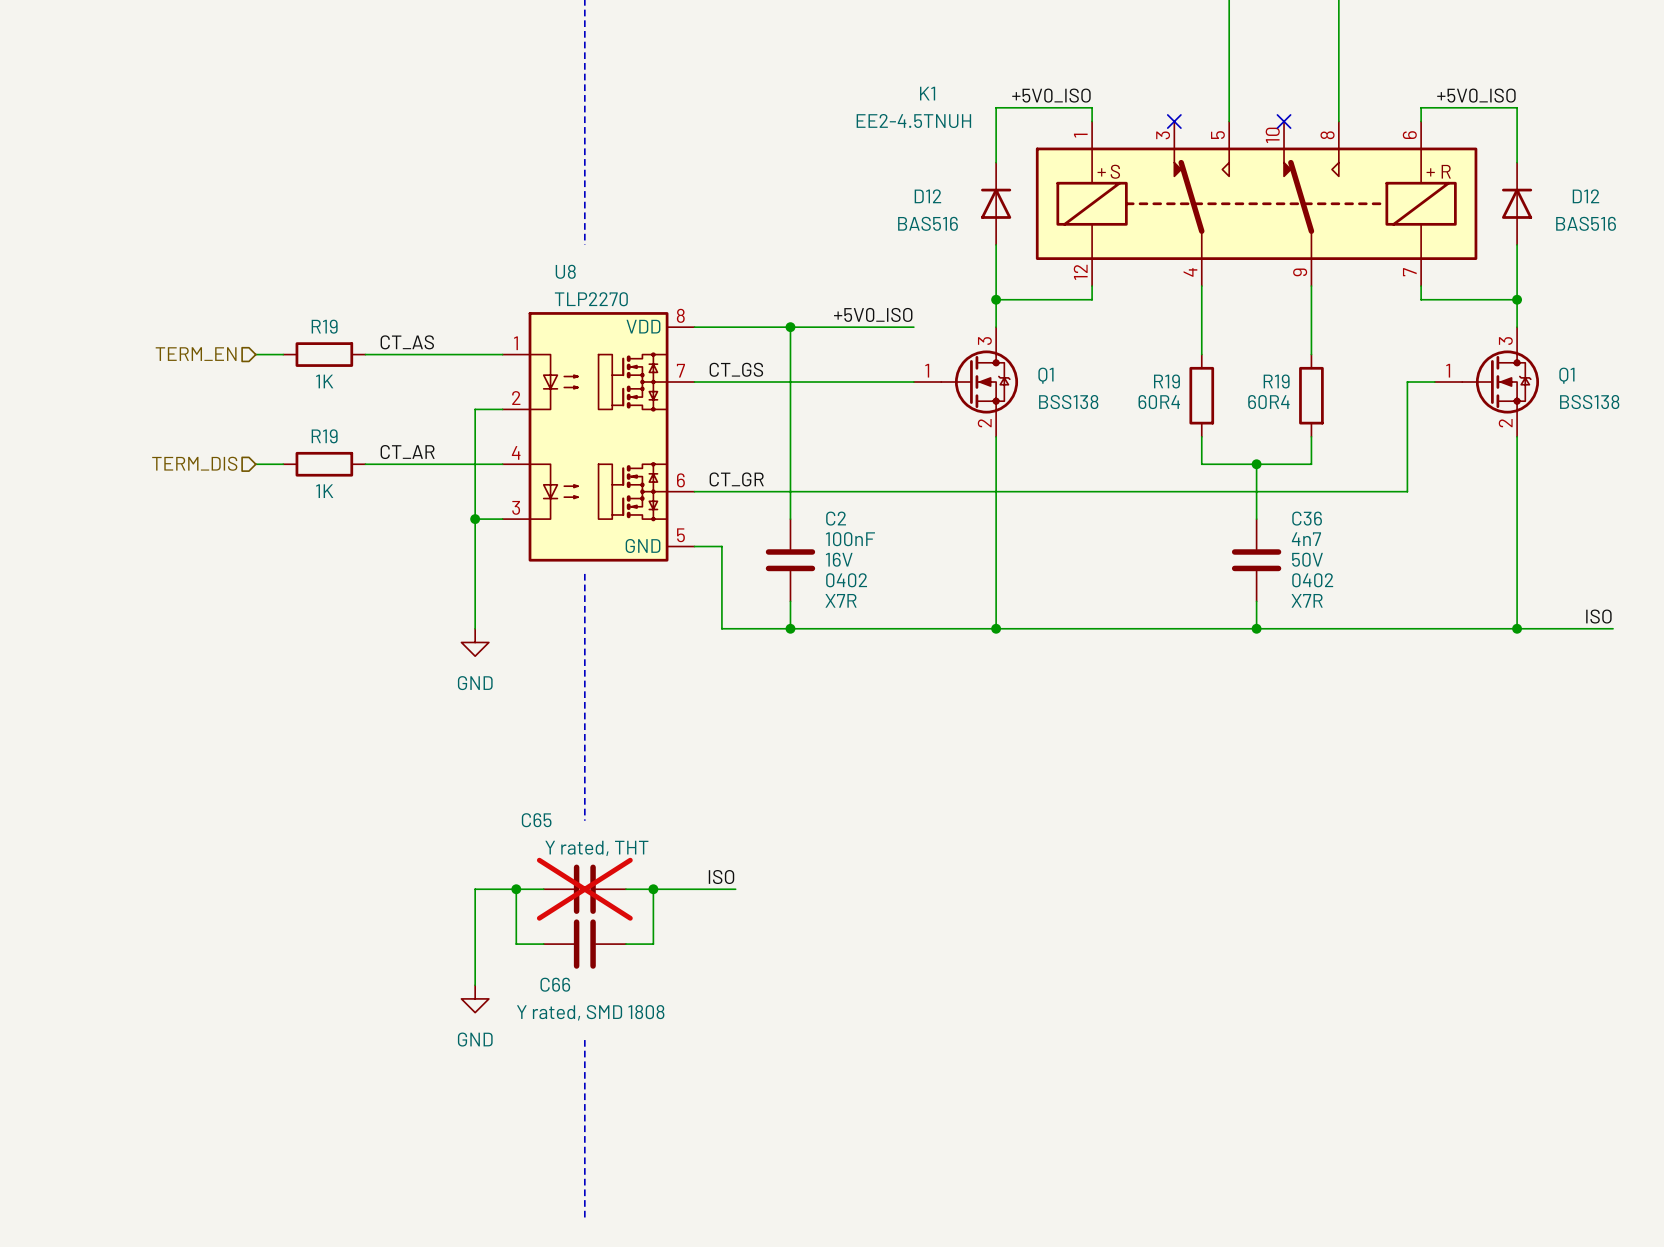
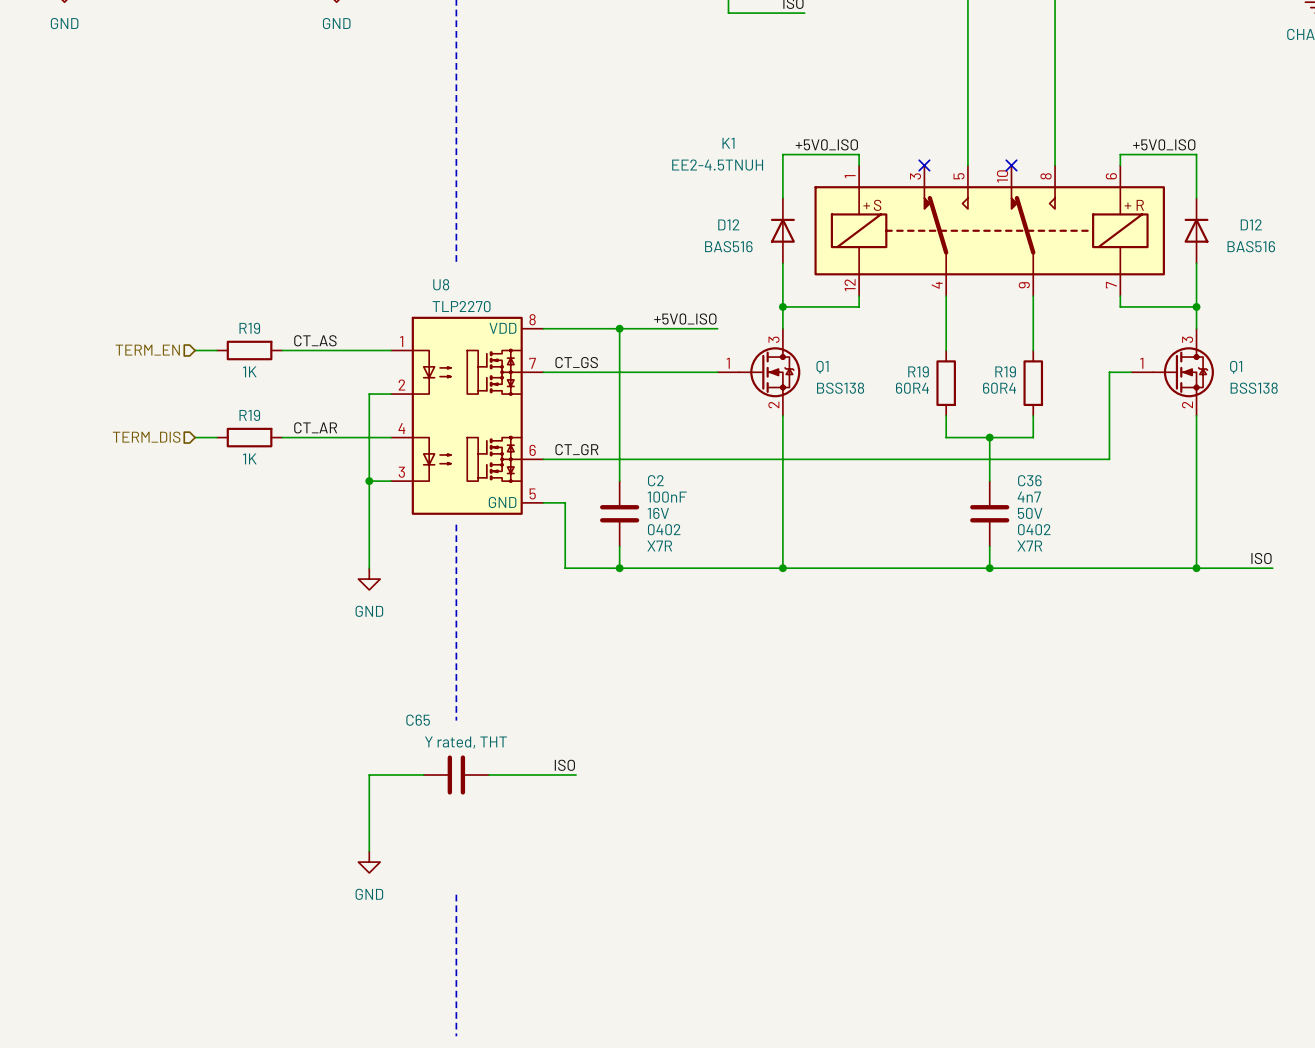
wire: (516, 889) (516, 944) (543, 944) -> none
junction: (516, 889) -> none
C65 do-not-place cross: (584, 889) -> none
wire: (653, 889) (653, 944) (625, 944) -> none
junction: (653, 889) -> none
C66: Y rated, SMD 1808 (584, 944) -> none

